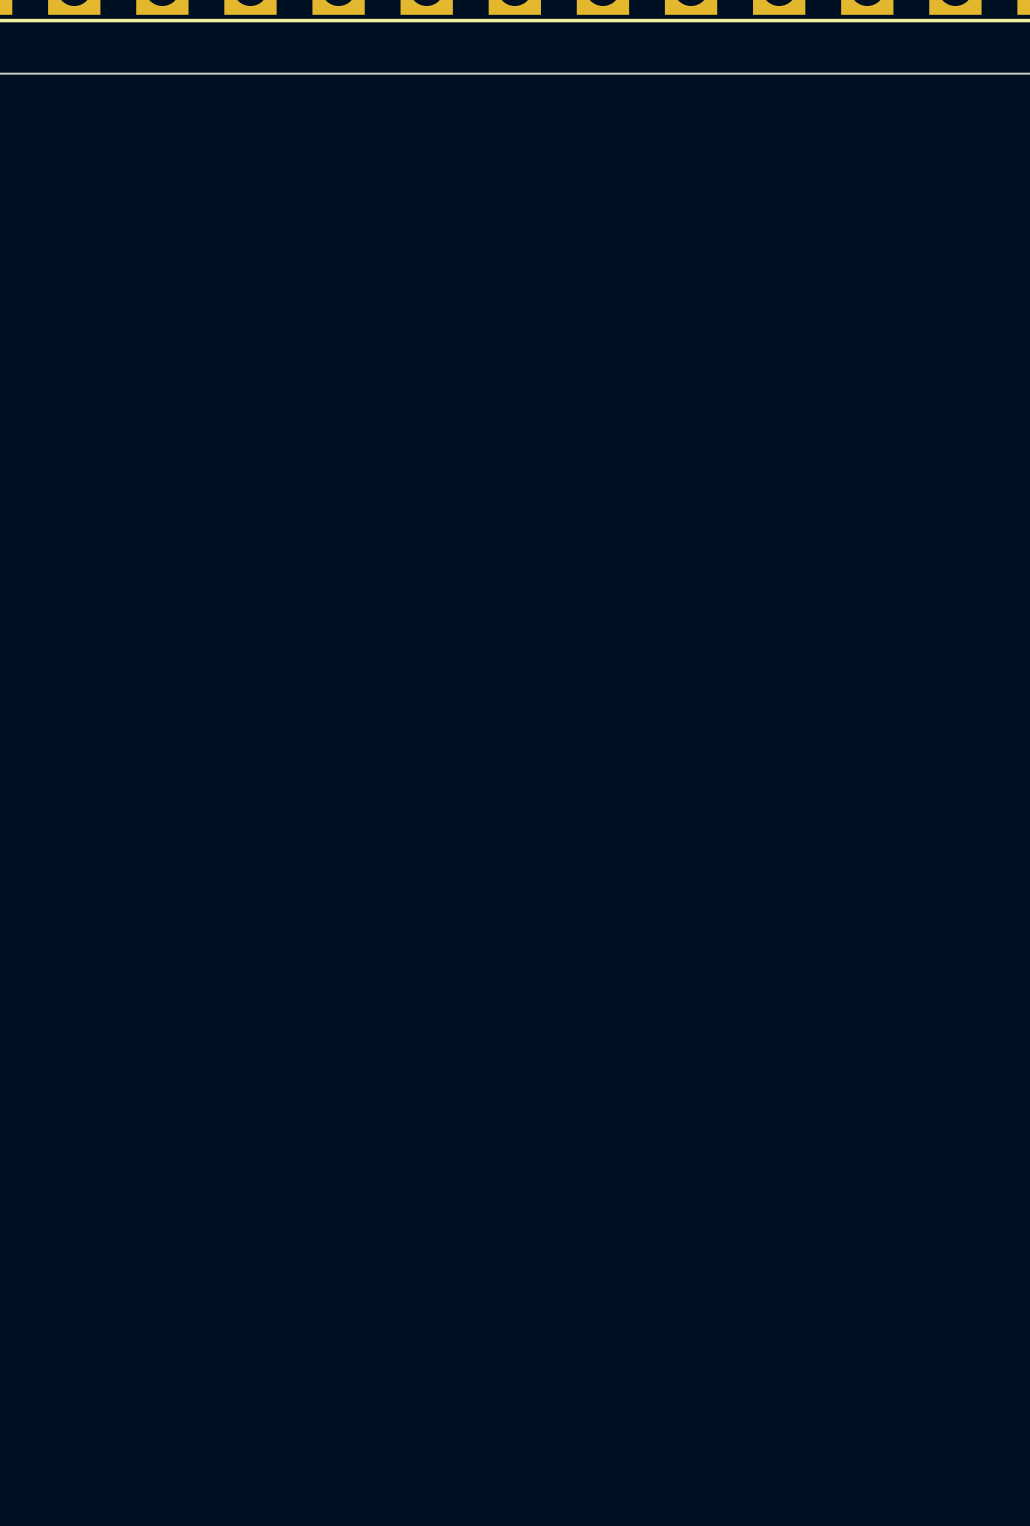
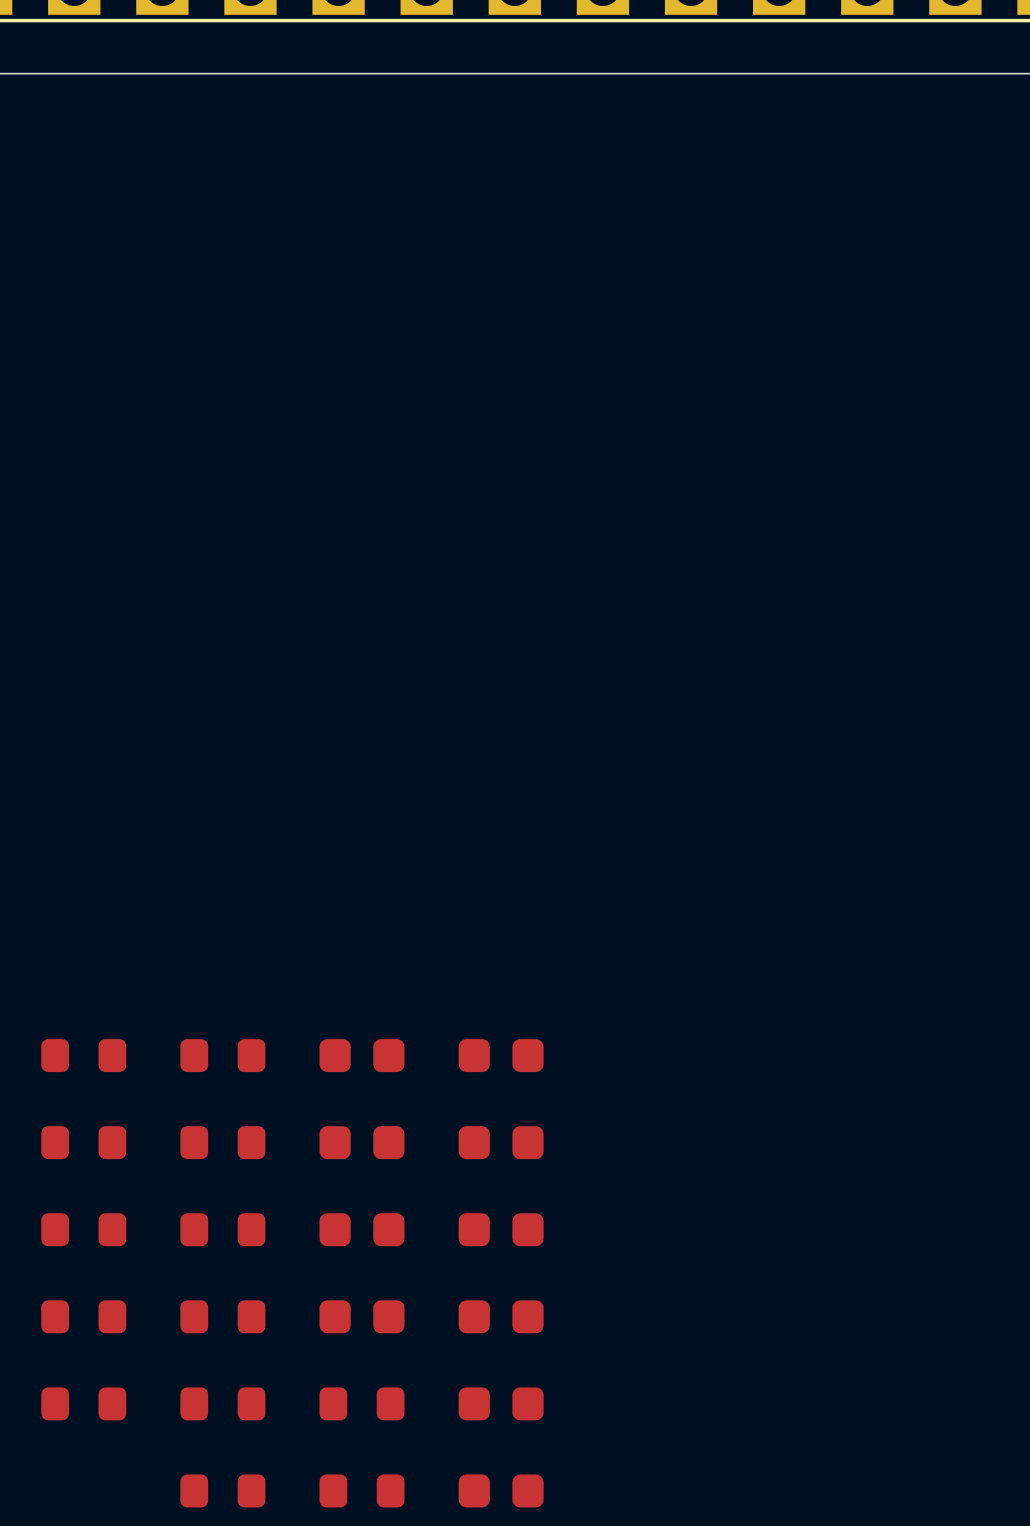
part: none -> (83, 1055)
part: none -> (222, 1055)
part: none -> (362, 1055)
part: none -> (501, 1055)
part: none -> (83, 1142)
part: none -> (222, 1142)
part: none -> (362, 1142)
part: none -> (501, 1142)
part: none -> (83, 1229)
part: none -> (222, 1229)
part: none -> (362, 1229)
part: none -> (501, 1229)
part: none -> (83, 1316)
part: none -> (222, 1316)
part: none -> (362, 1316)
part: none -> (501, 1316)
part: none -> (83, 1403)
part: none -> (222, 1403)
part: none -> (362, 1403)
part: none -> (501, 1403)
part: none -> (222, 1490)
part: none -> (362, 1490)
part: none -> (501, 1490)

